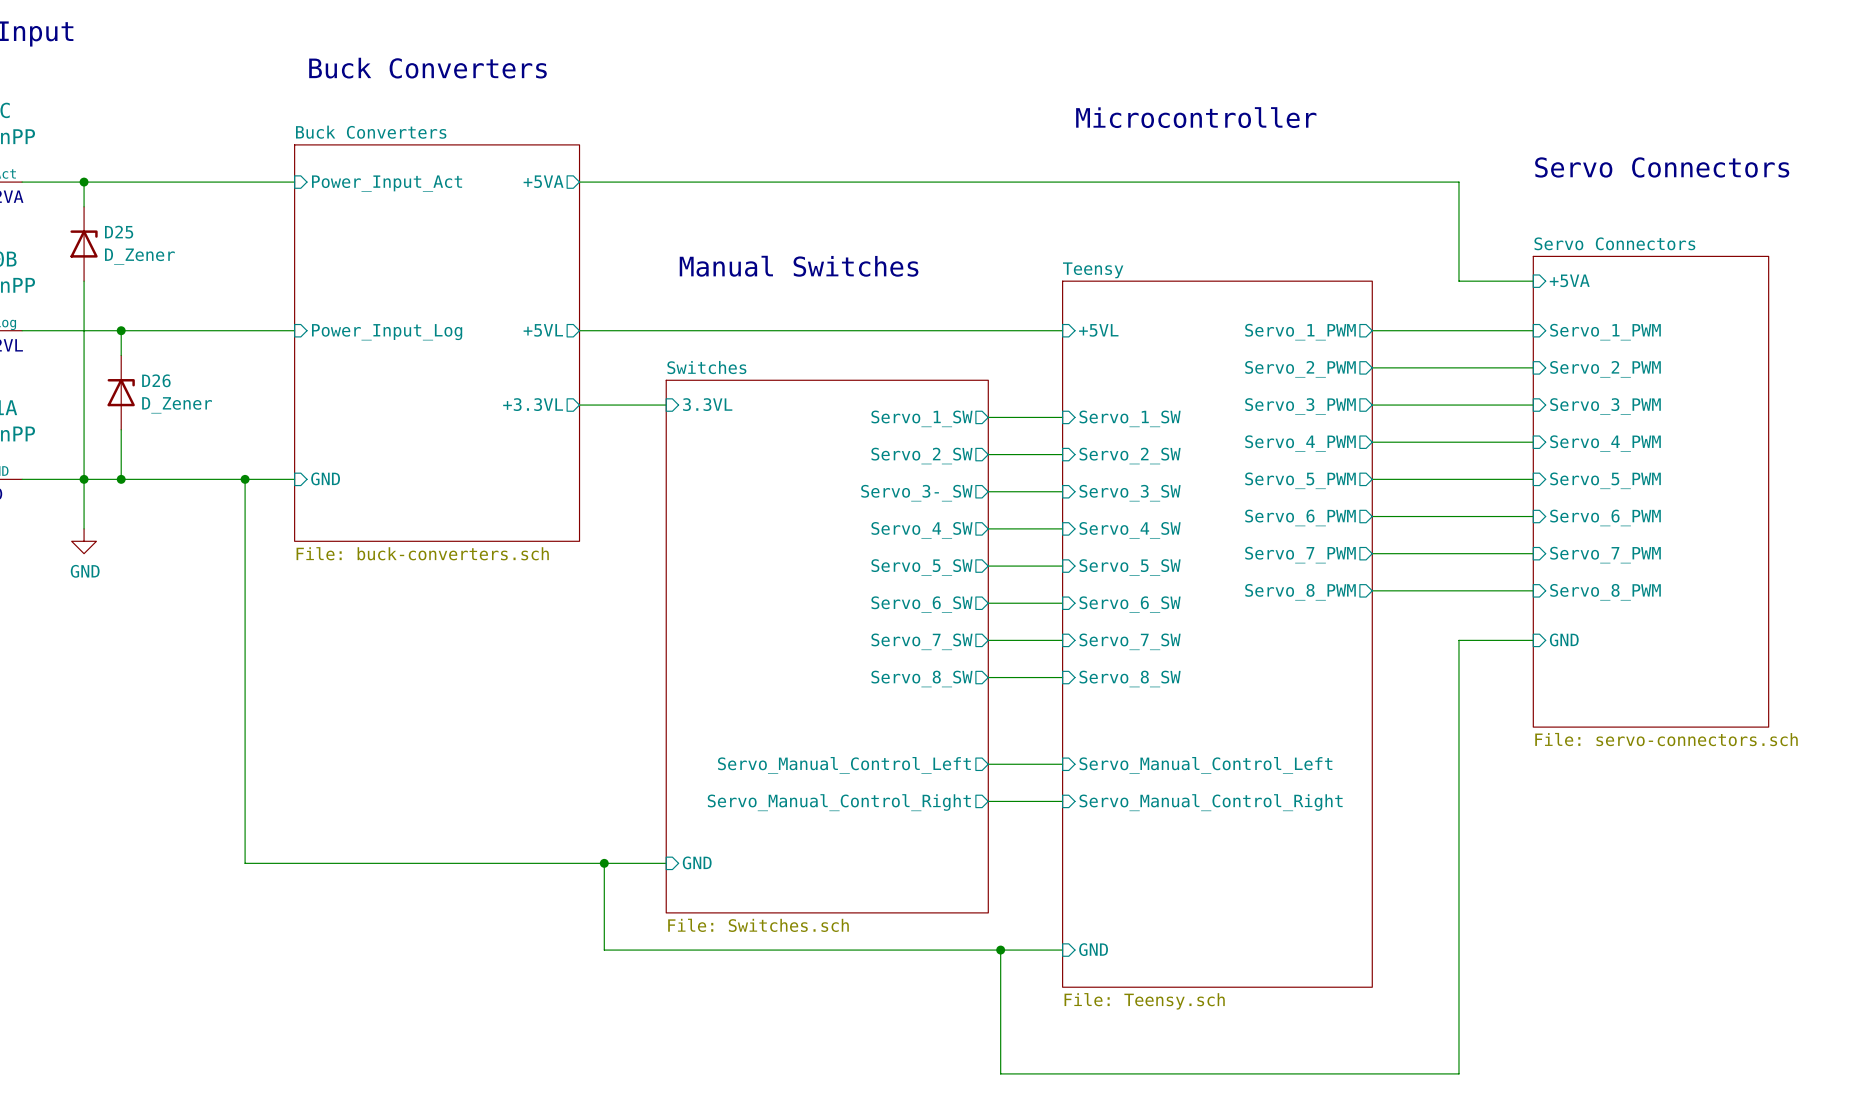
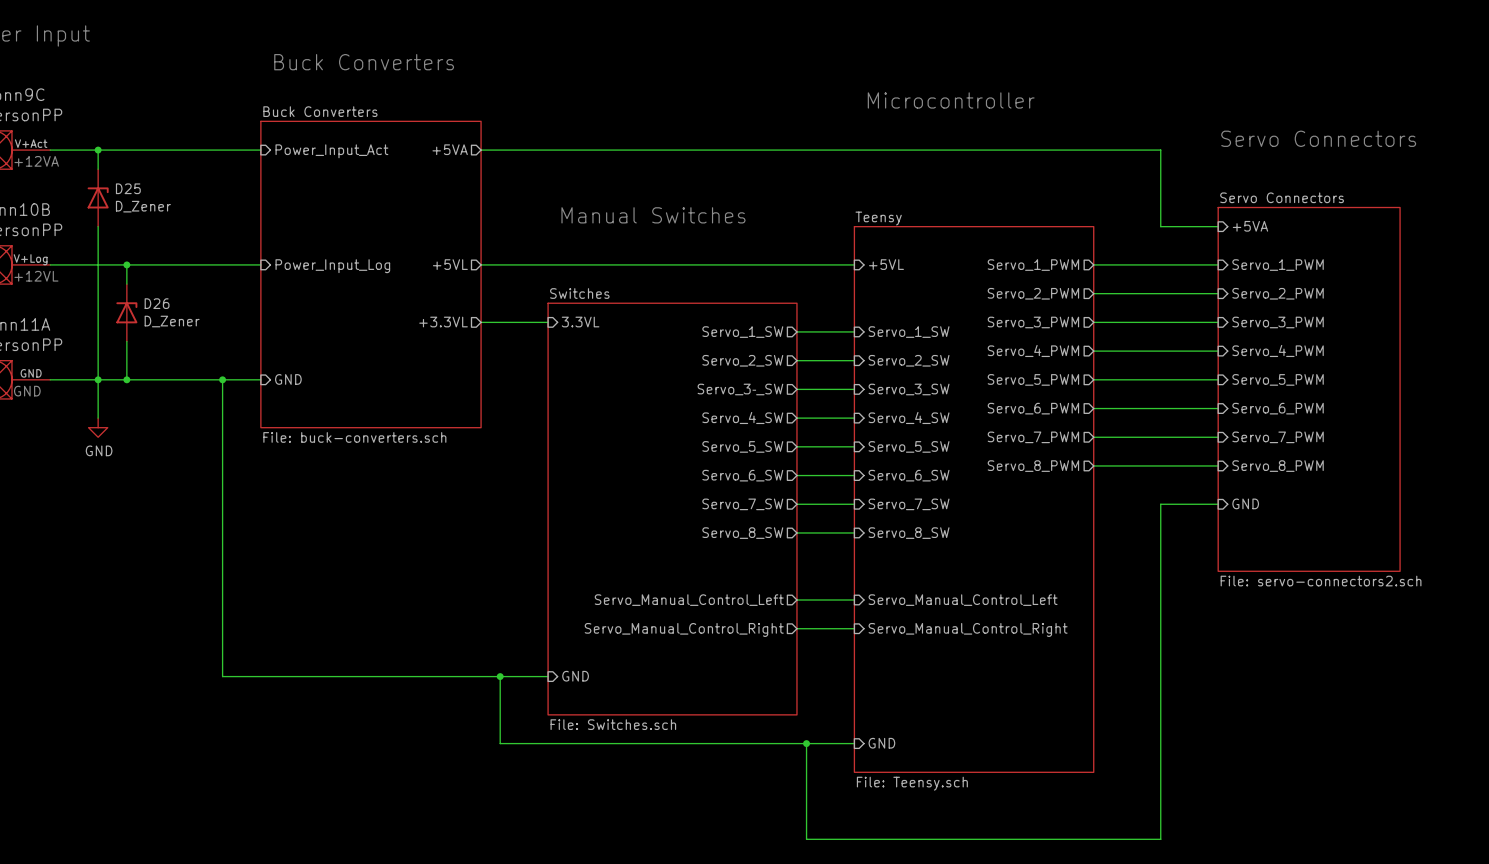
sheet Servo Connectors value: File: servo-connectors.sch (1666, 739) -> File: servo-connectors2.sch (1321, 581)

